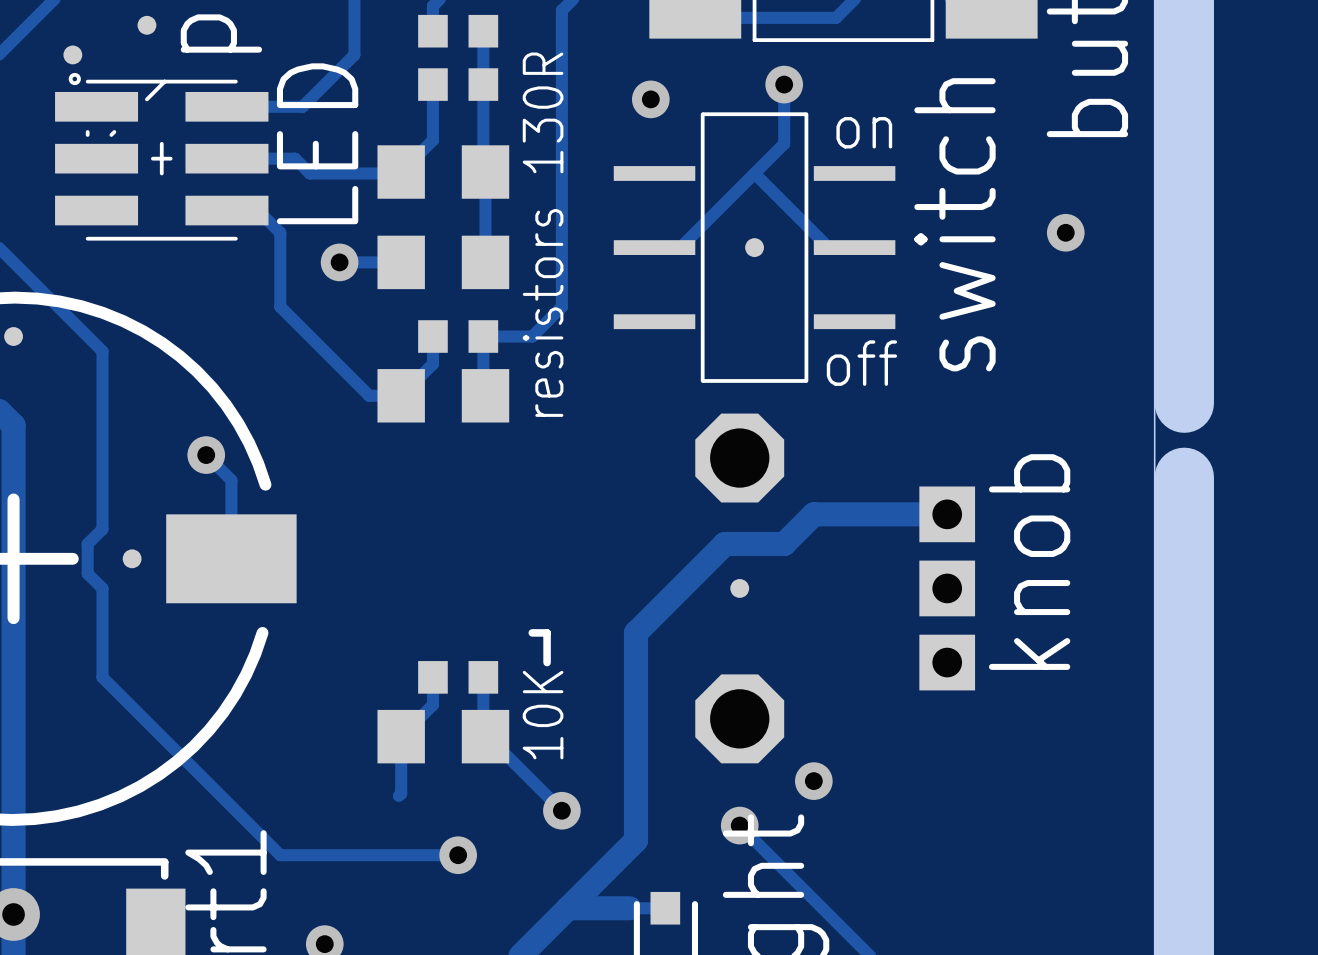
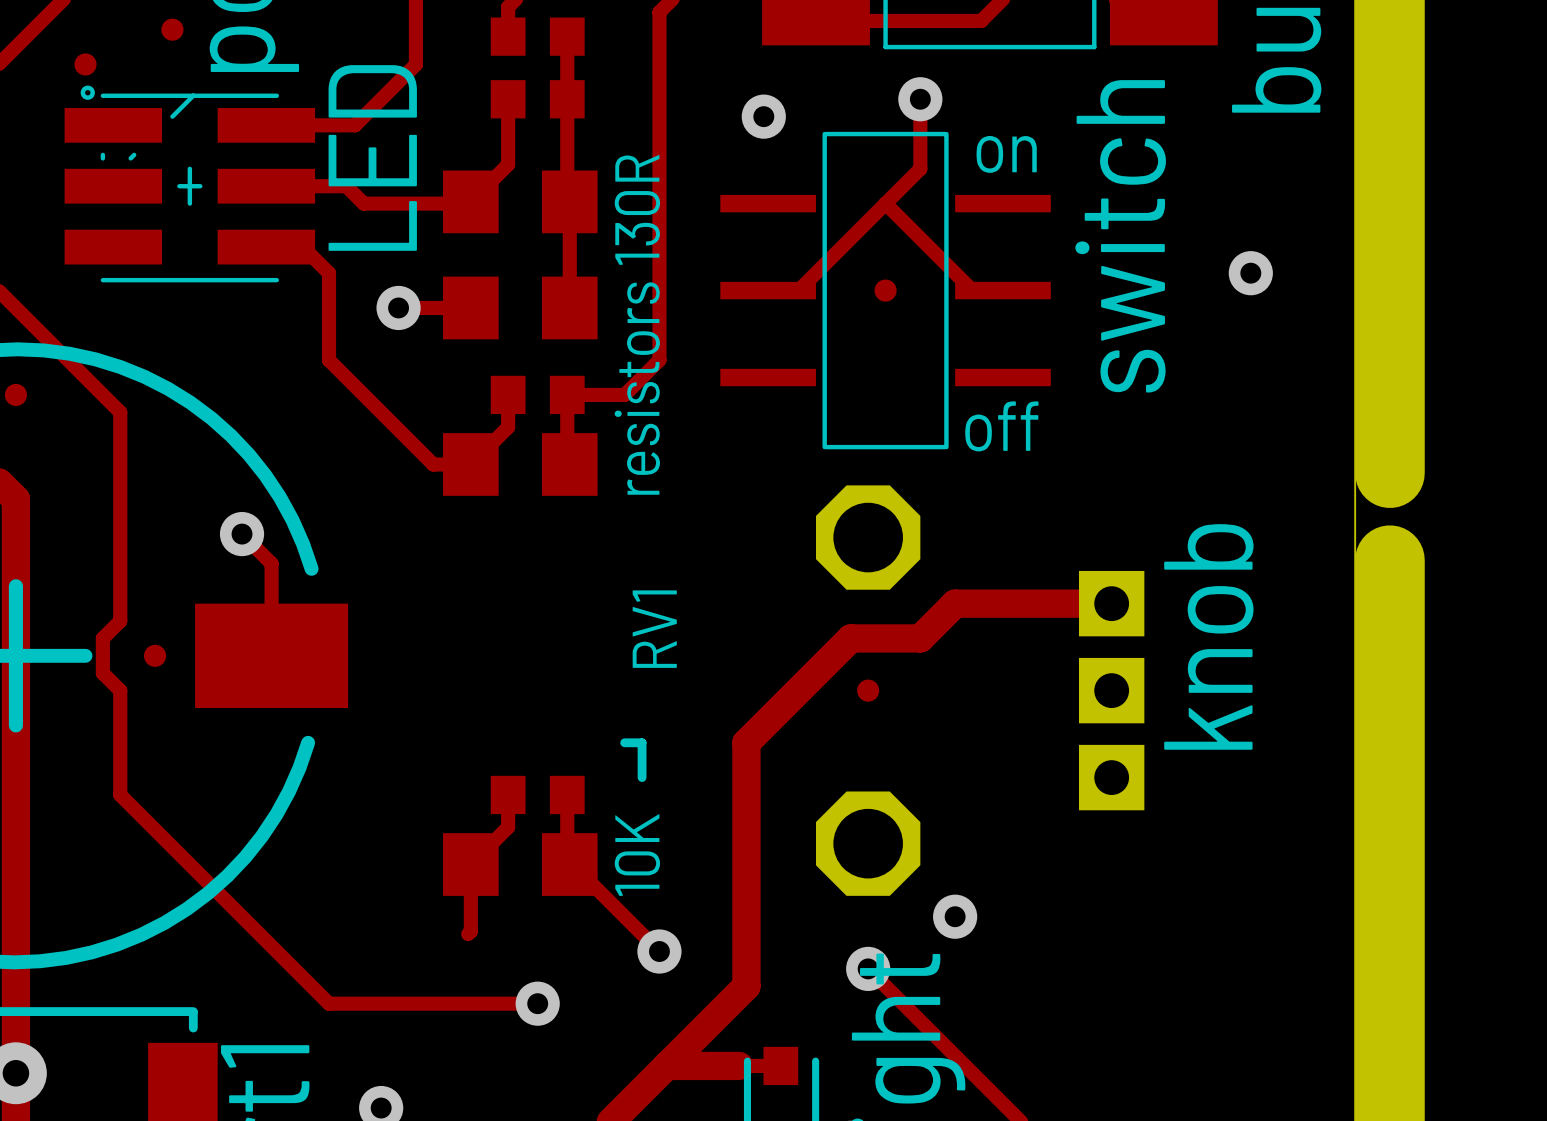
text: none -> RV1 (654, 629)

